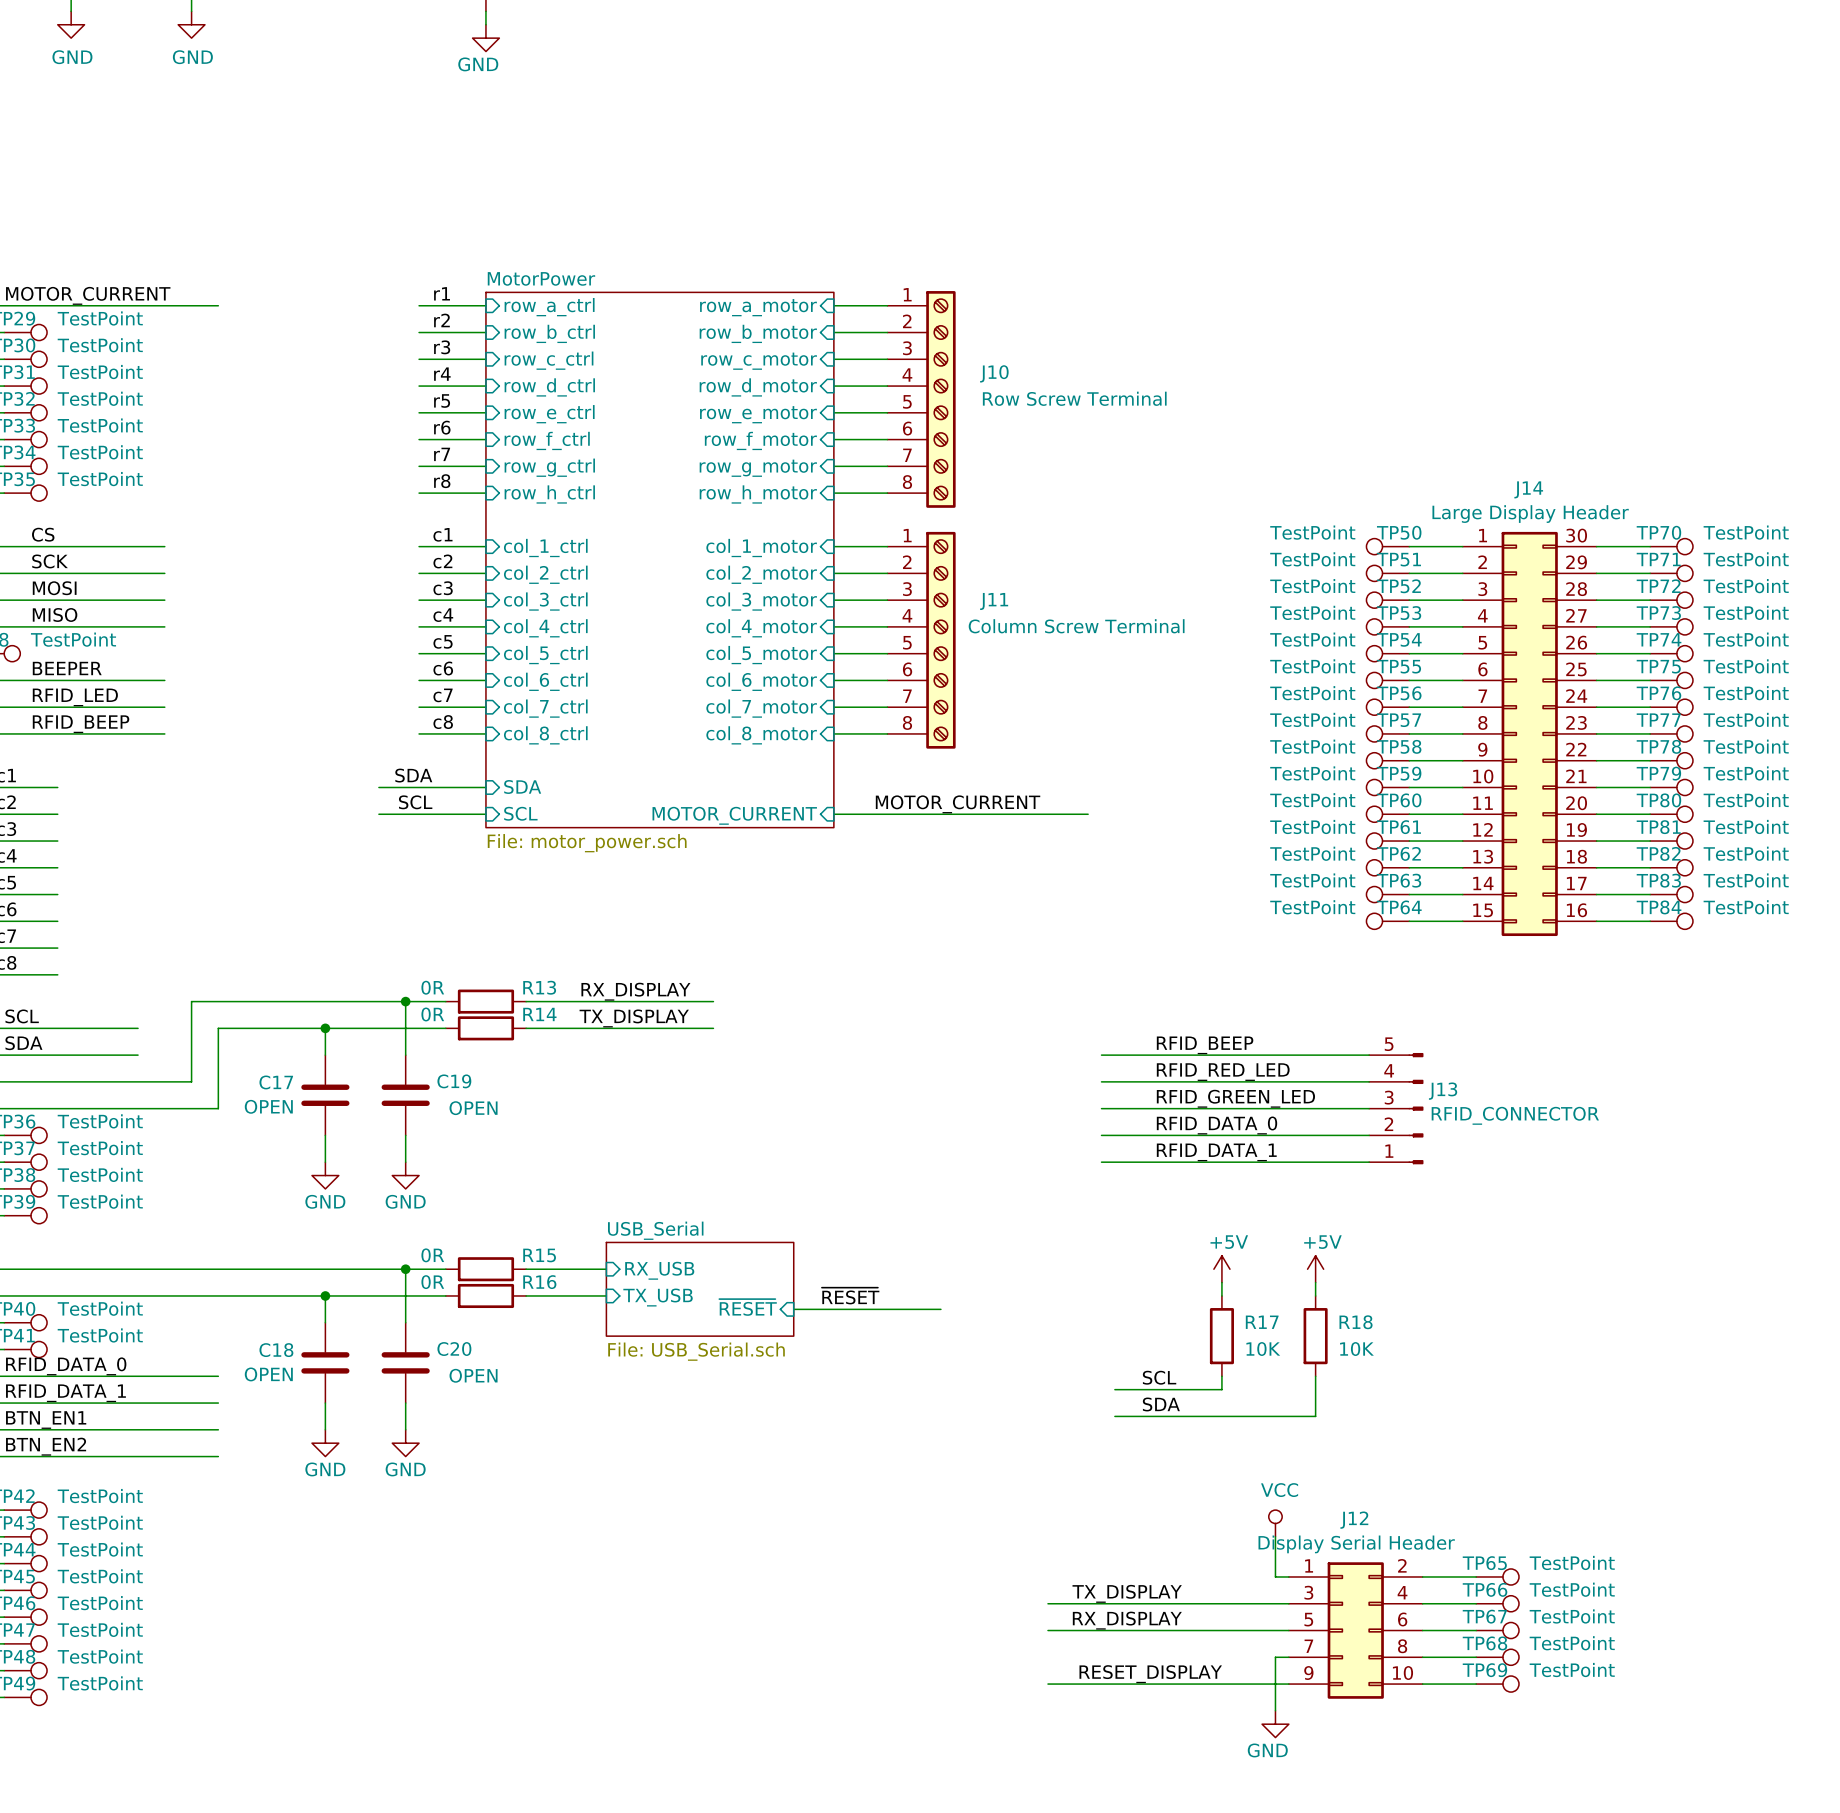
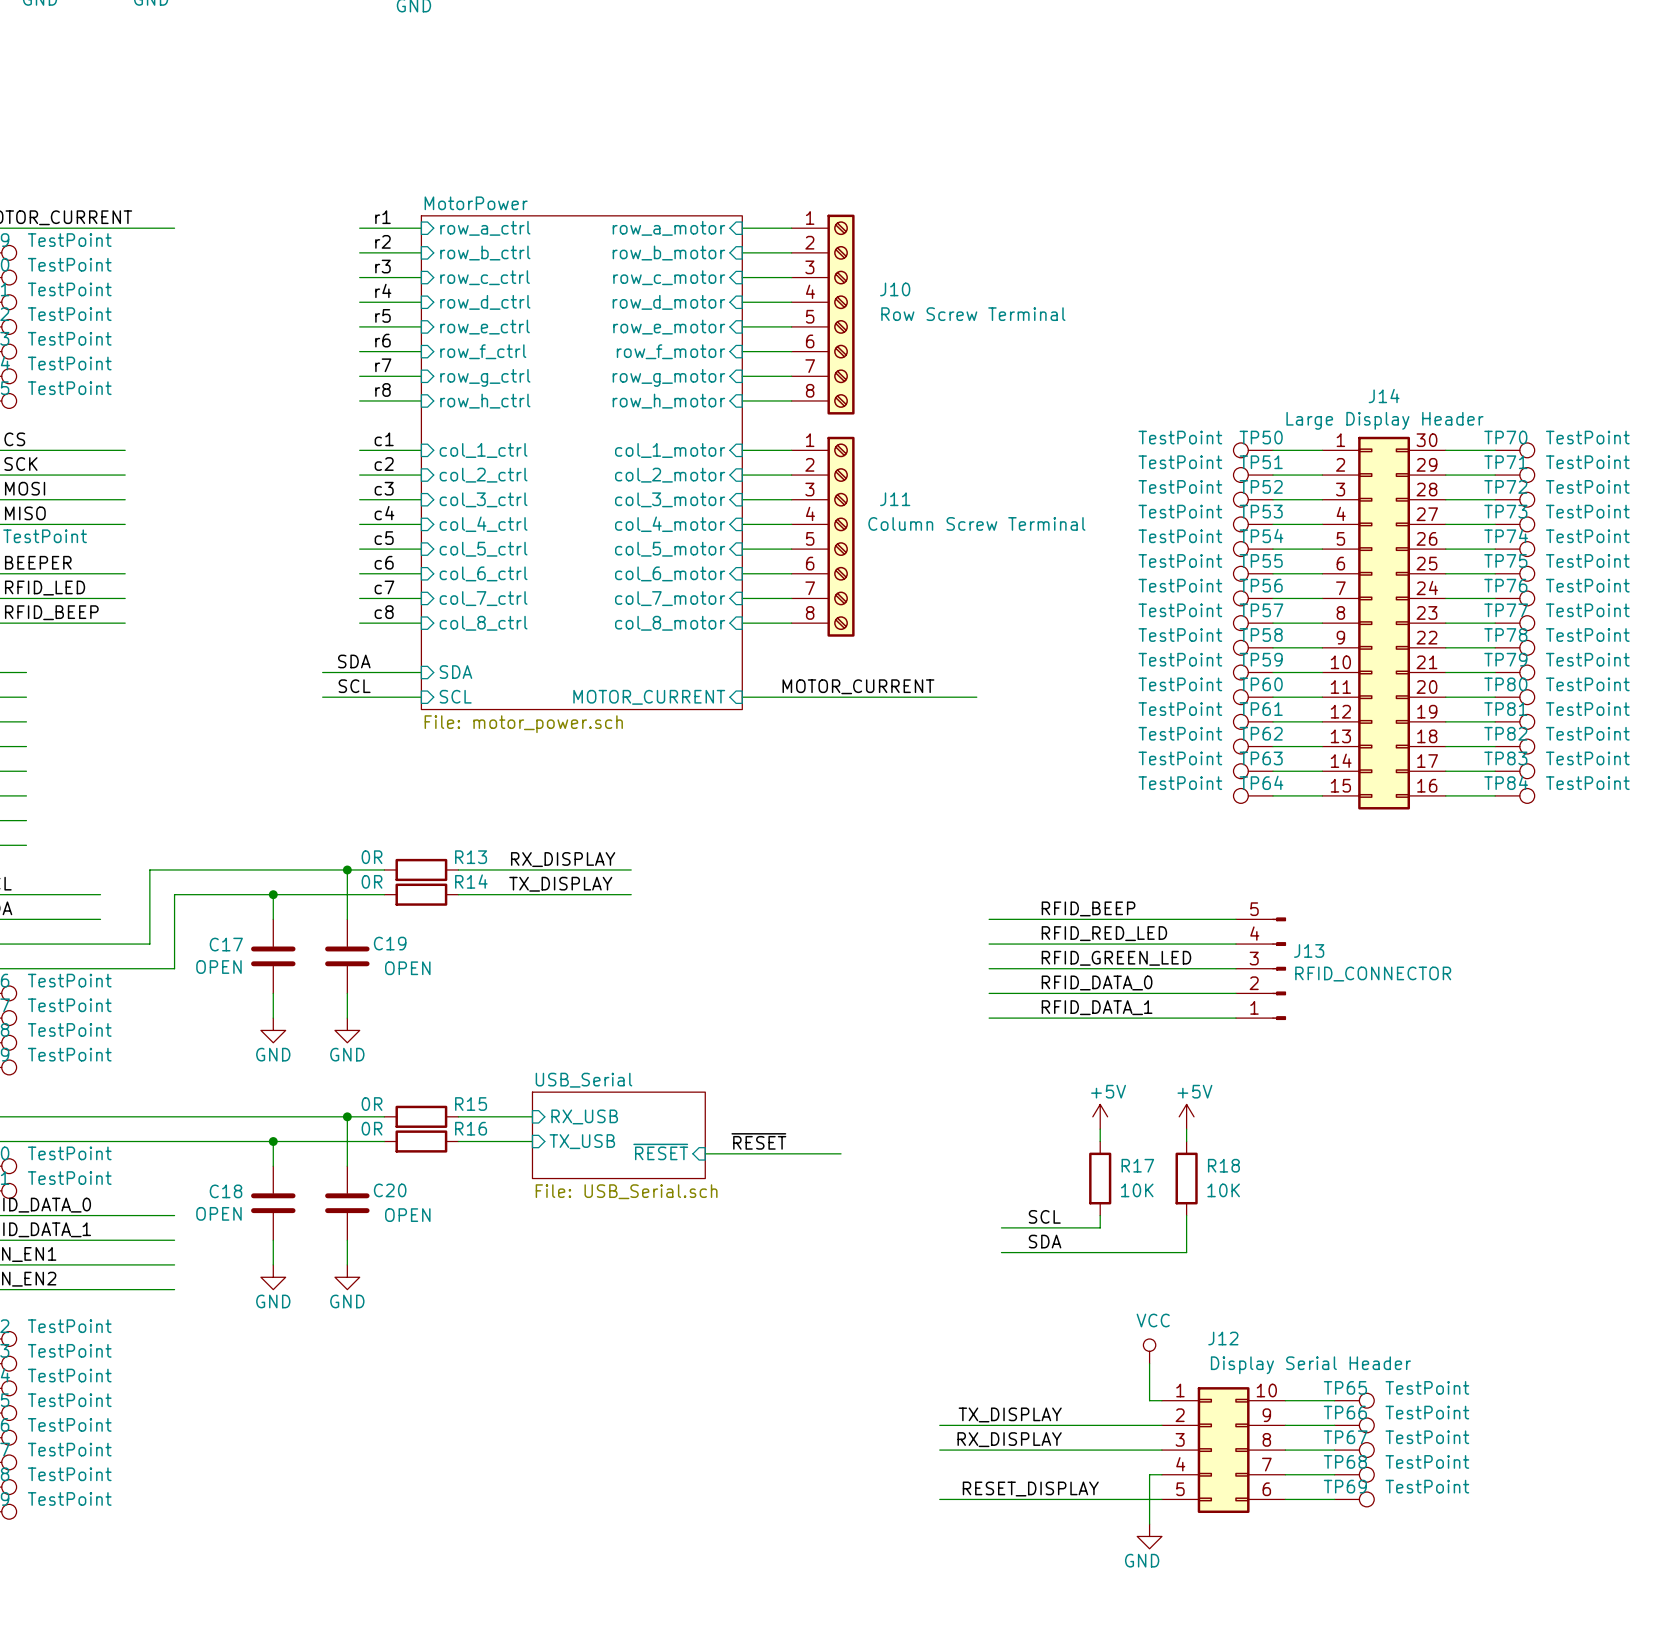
J12 value position: Display Serial Header (1356, 1544) -> Display Serial Header (1310, 1365)
J12 symbol: [1288, 1562, 1423, 1699] -> [1161, 1387, 1286, 1514]

